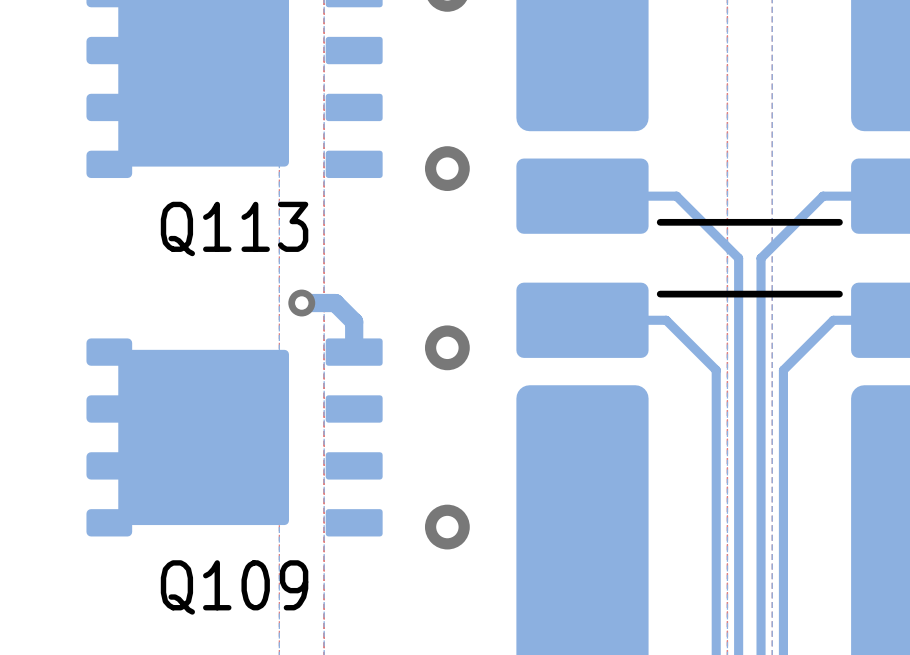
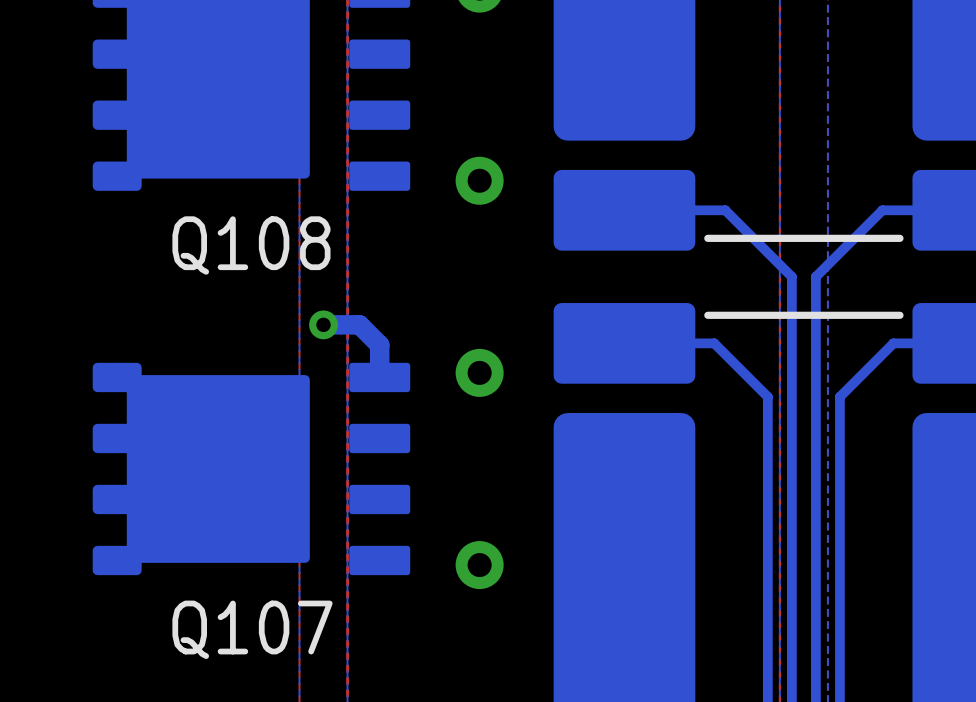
Q113 name: Q113 (234, 228) -> Q108 (251, 245)
Q109 name: Q109 (234, 587) -> Q107 (252, 629)

